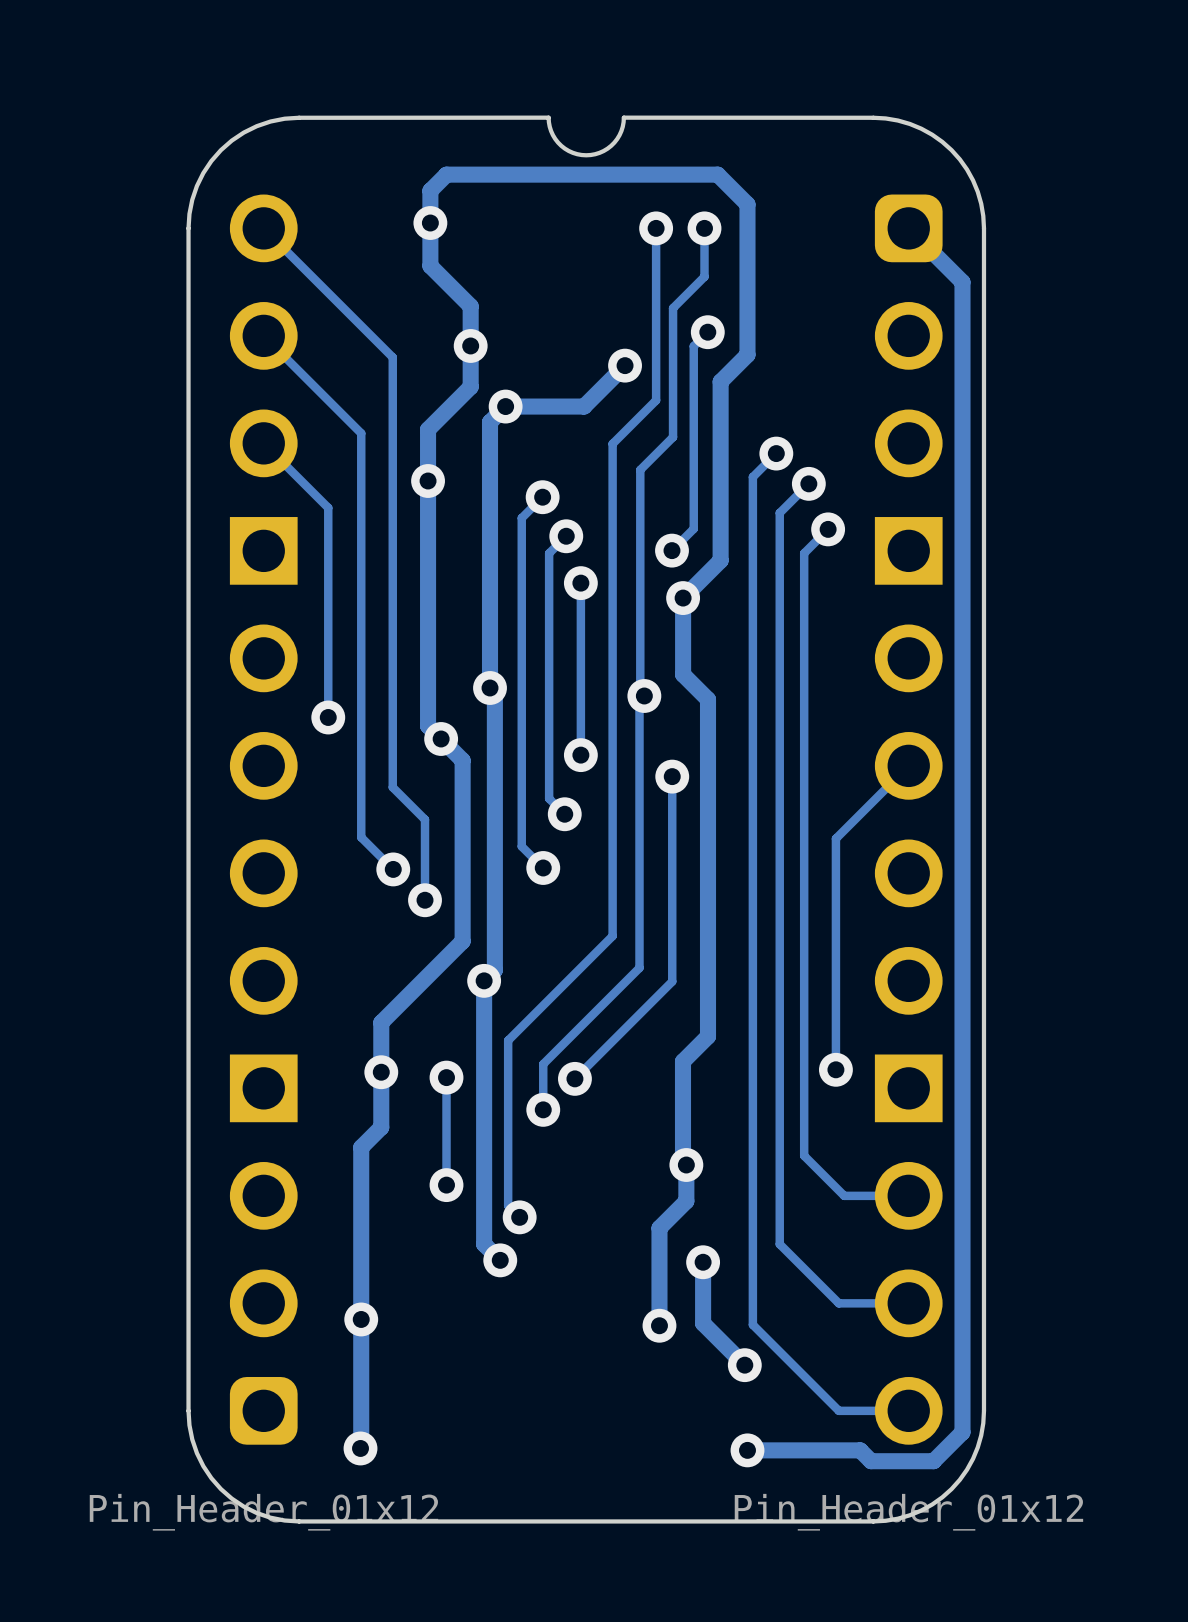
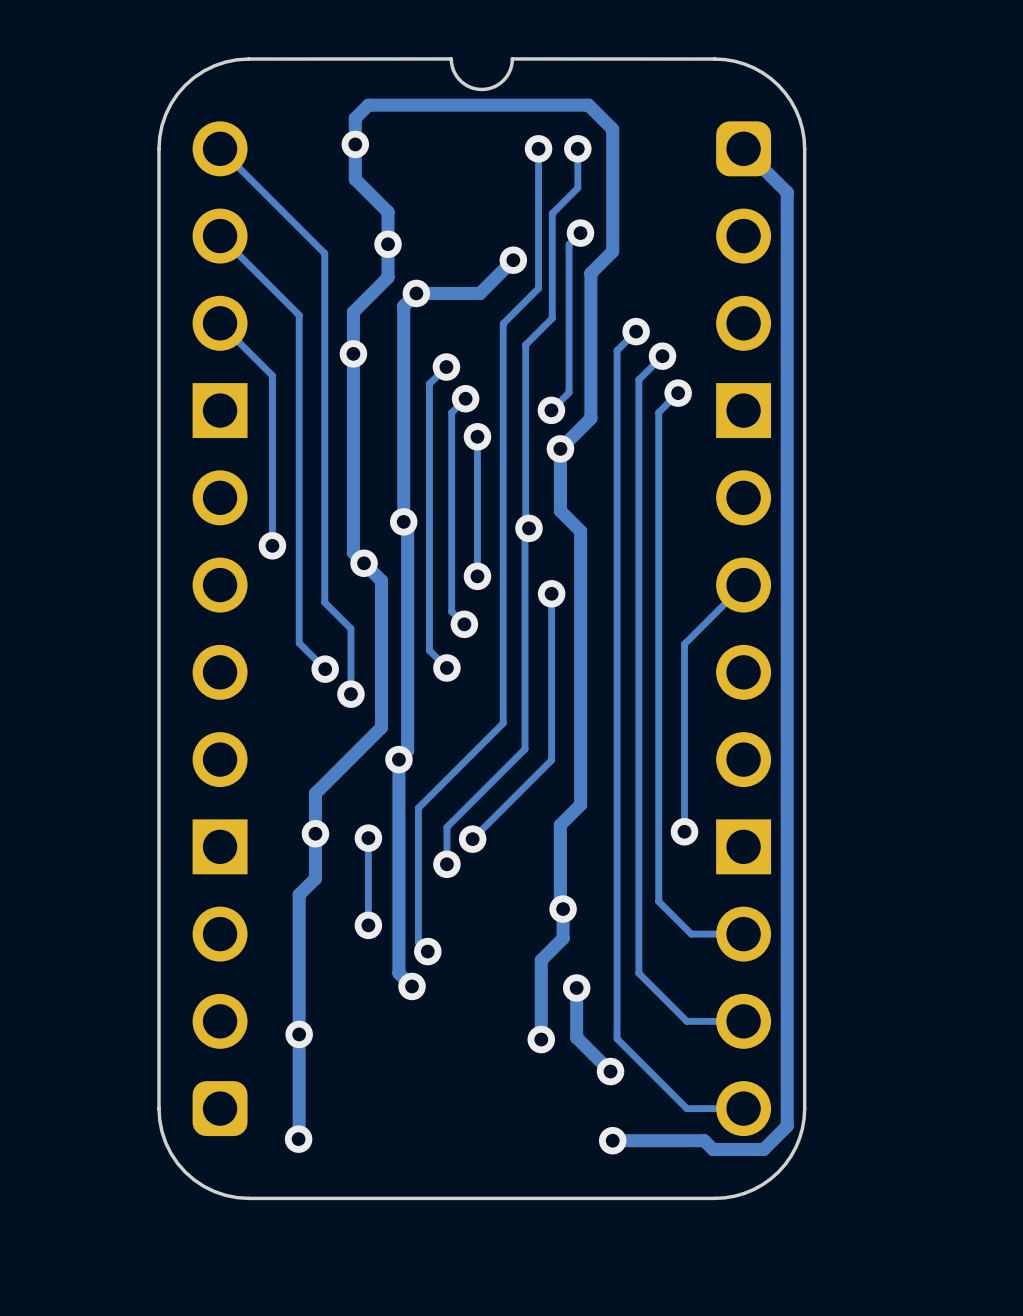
drawing: [89, 1493, 439, 1531] -> none
drawing: [734, 1493, 1084, 1531] -> none

